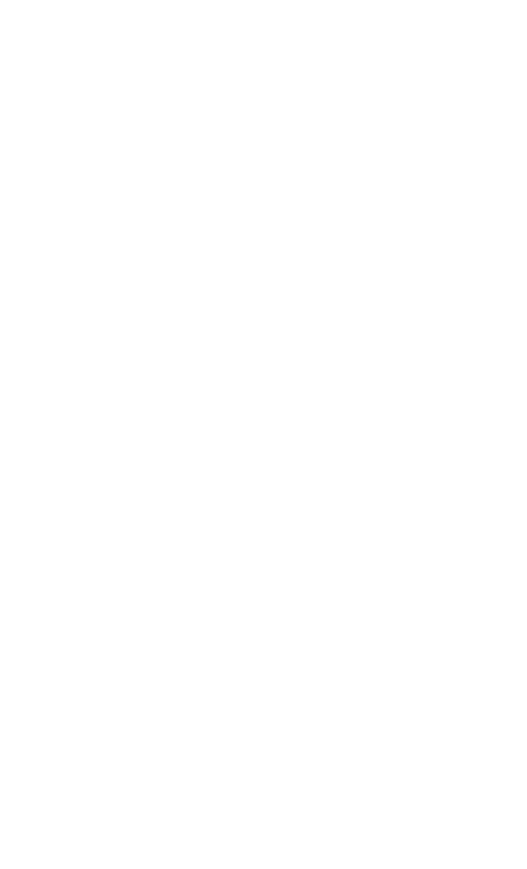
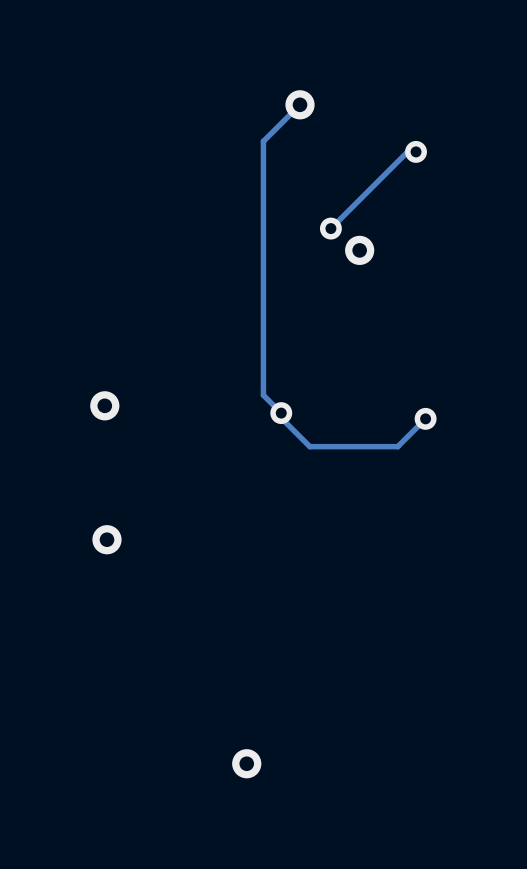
track: none -> (300, 104) (263, 141) (263, 395) (281, 413) (281, 418) (309, 446) (397, 446) (425, 418)
via: none -> (300, 104)
track: none -> (416, 151) (407, 151) (330, 228)
via: none -> (416, 151)
via: none -> (330, 228)
via: none -> (359, 250)
via: none -> (104, 405)
via: none -> (281, 413)
via: none -> (425, 418)
via: none -> (107, 539)
via: none -> (246, 763)

